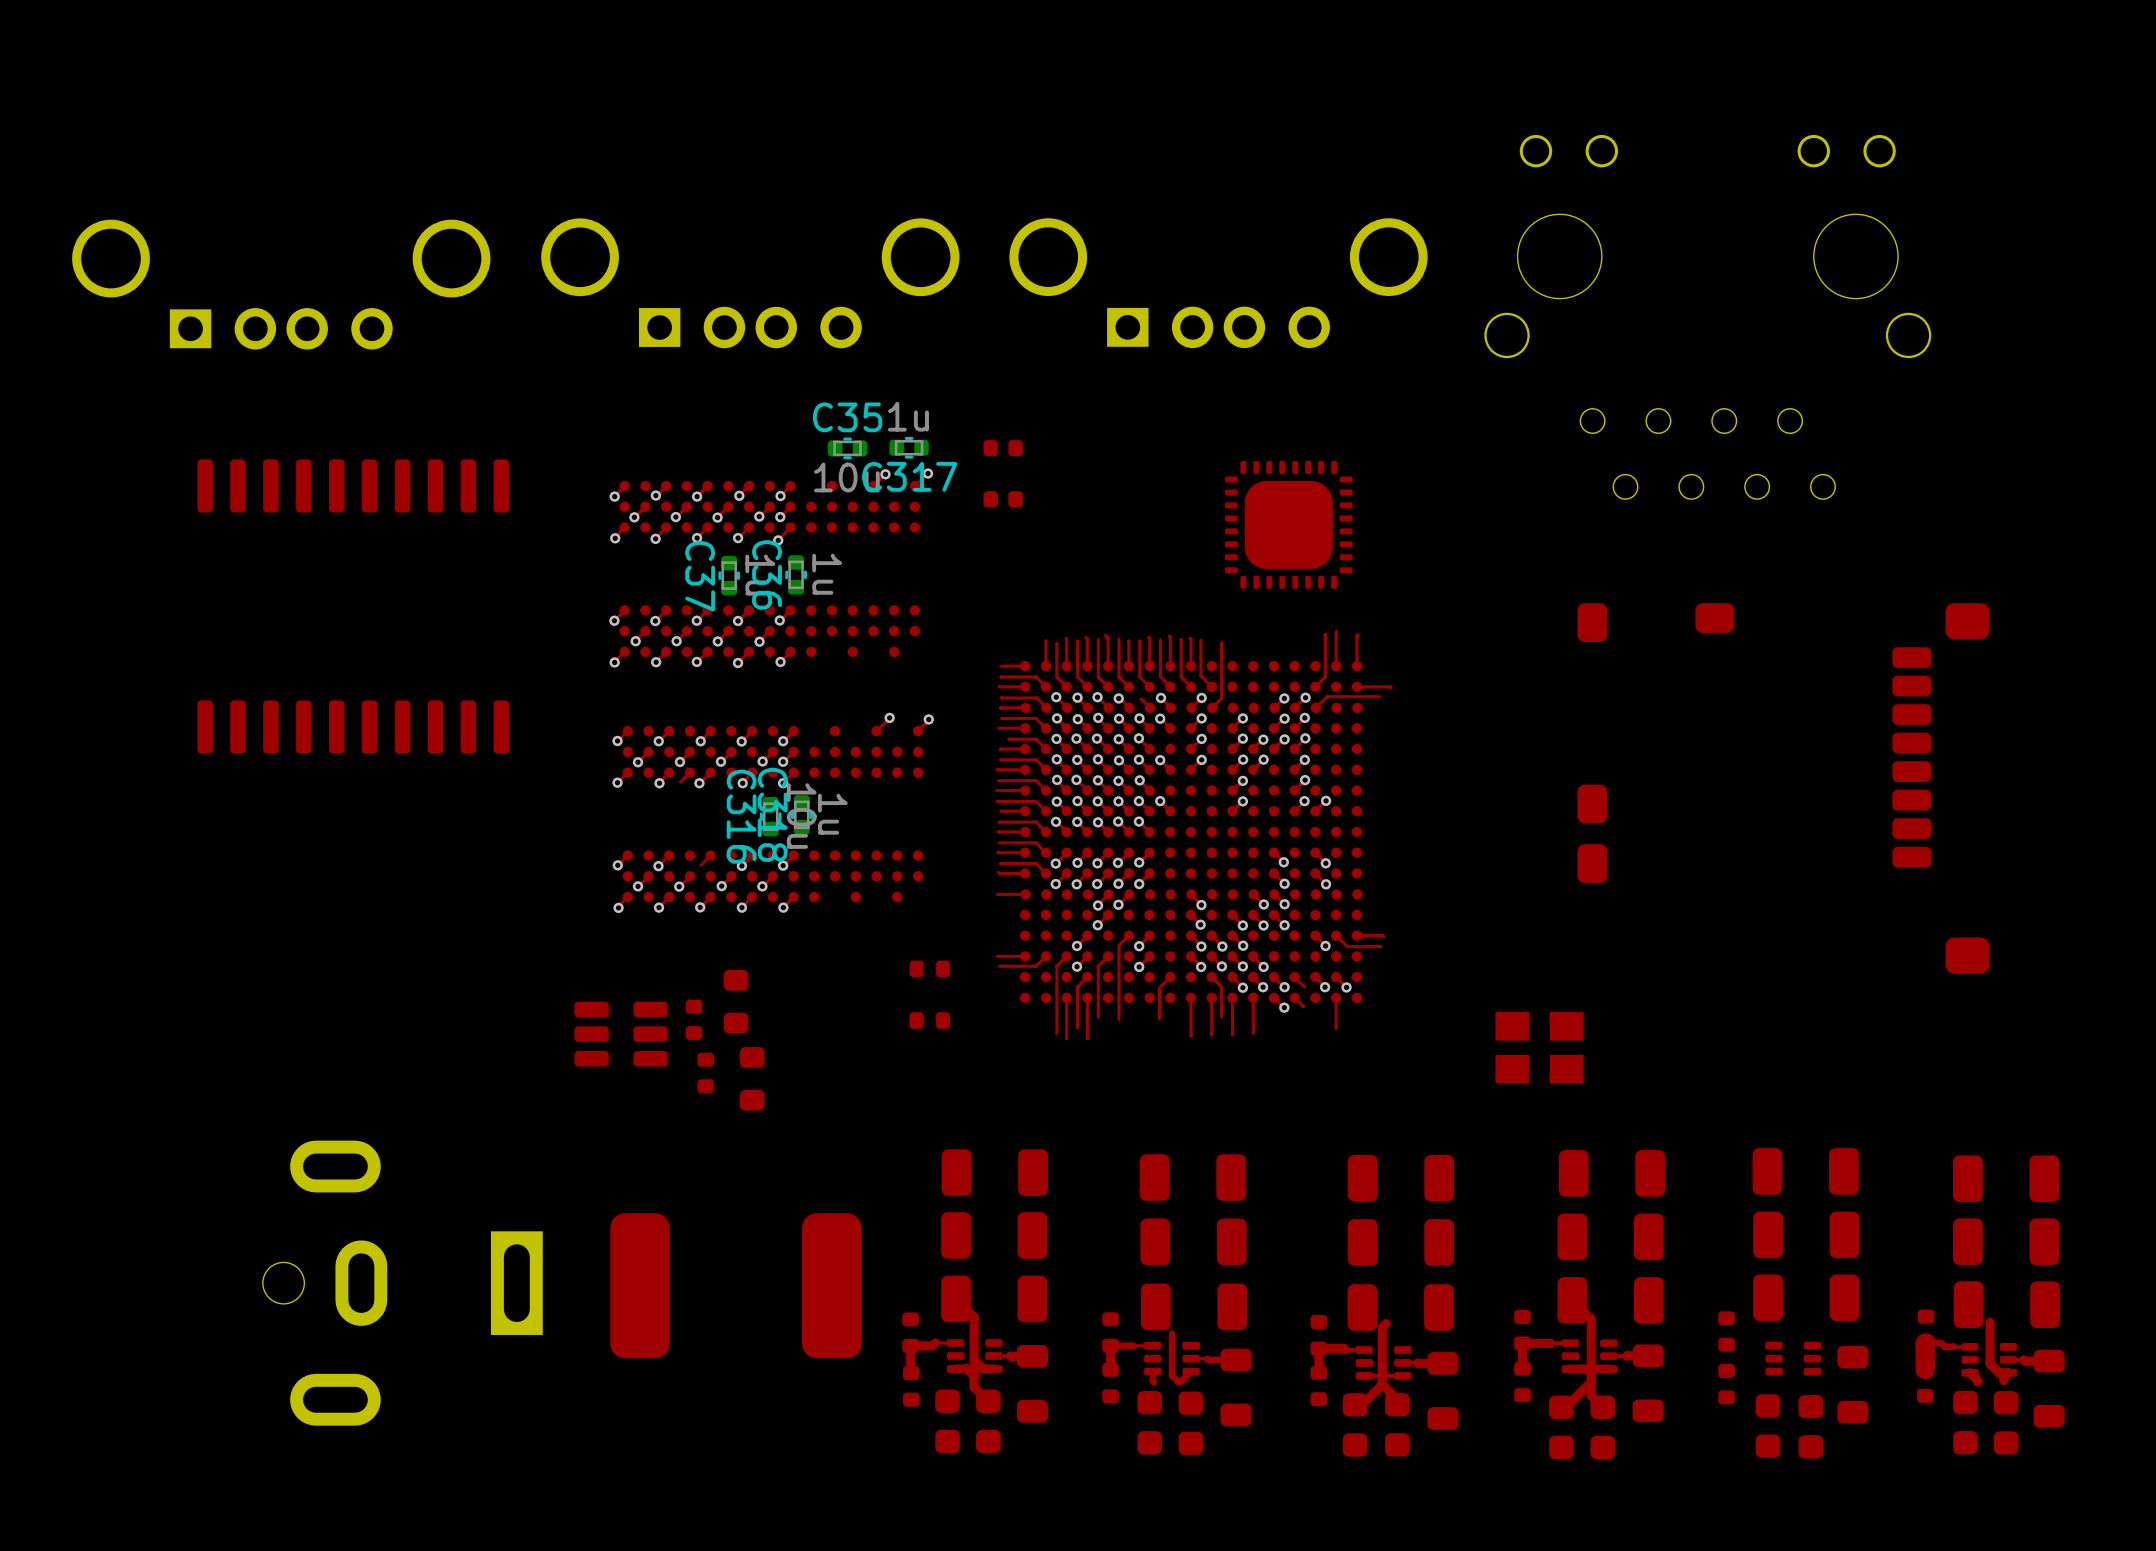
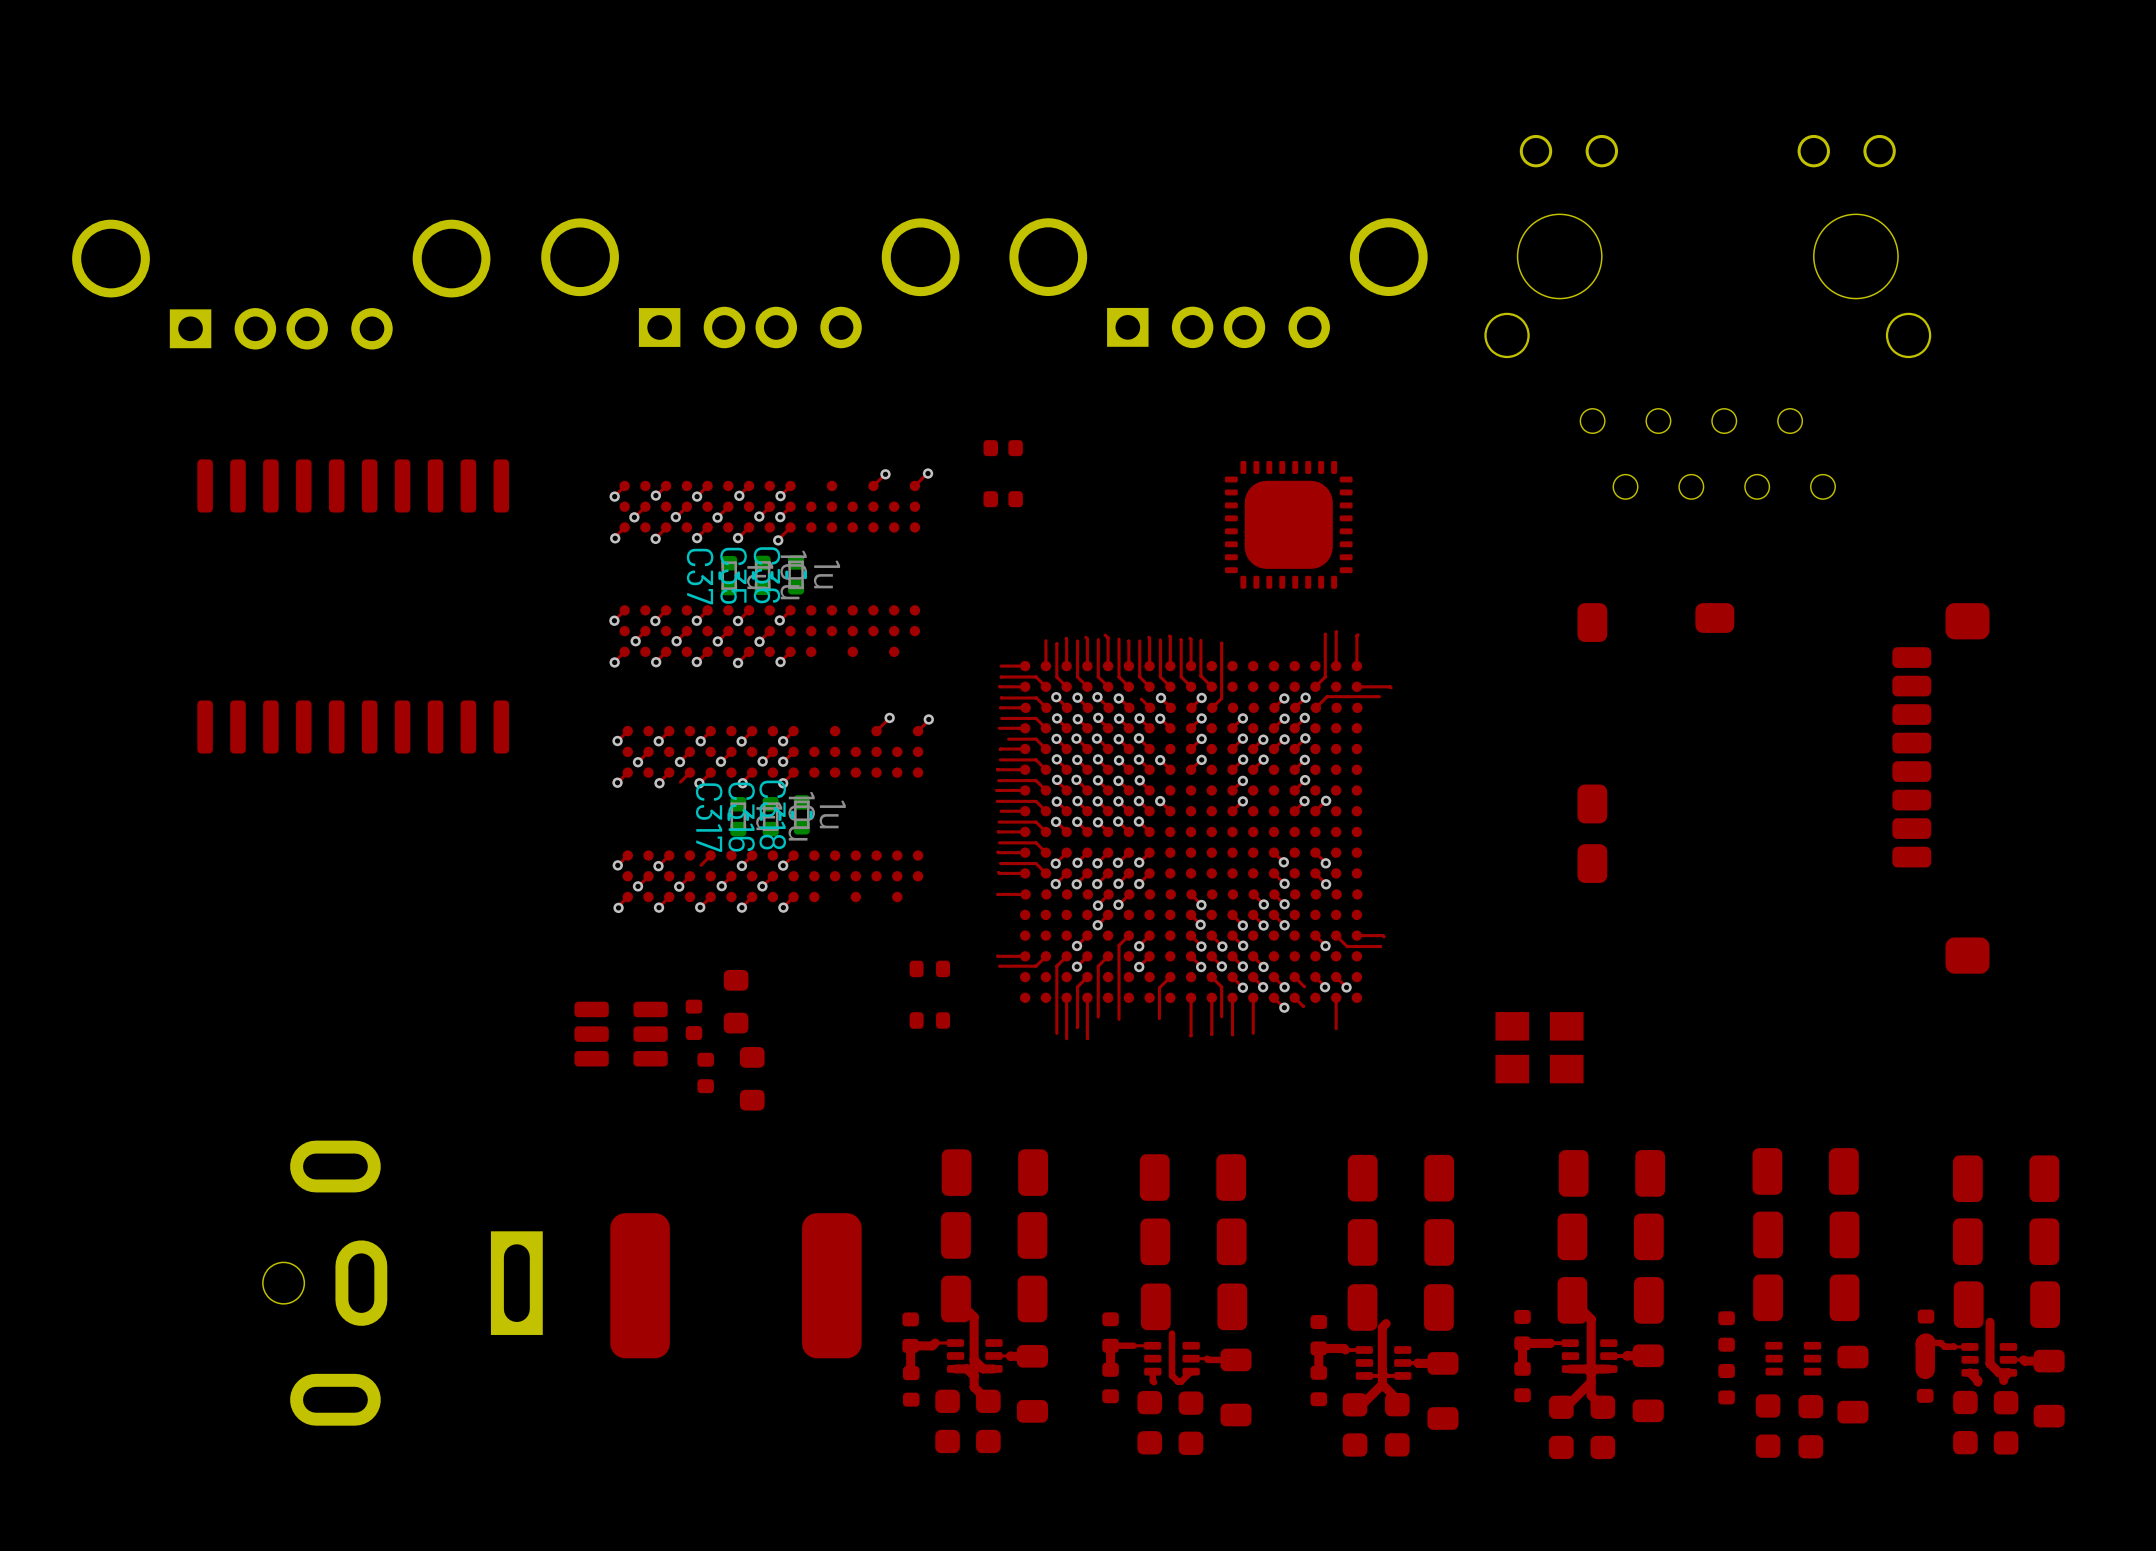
C317 rotation: 0° (909, 447) -> 90° clockwise (738, 816)
C317 position: (909, 447) -> (738, 816)
C35 rotation: 0° (847, 448) -> 90° clockwise (762, 575)
C35 position: (847, 448) -> (762, 575)

